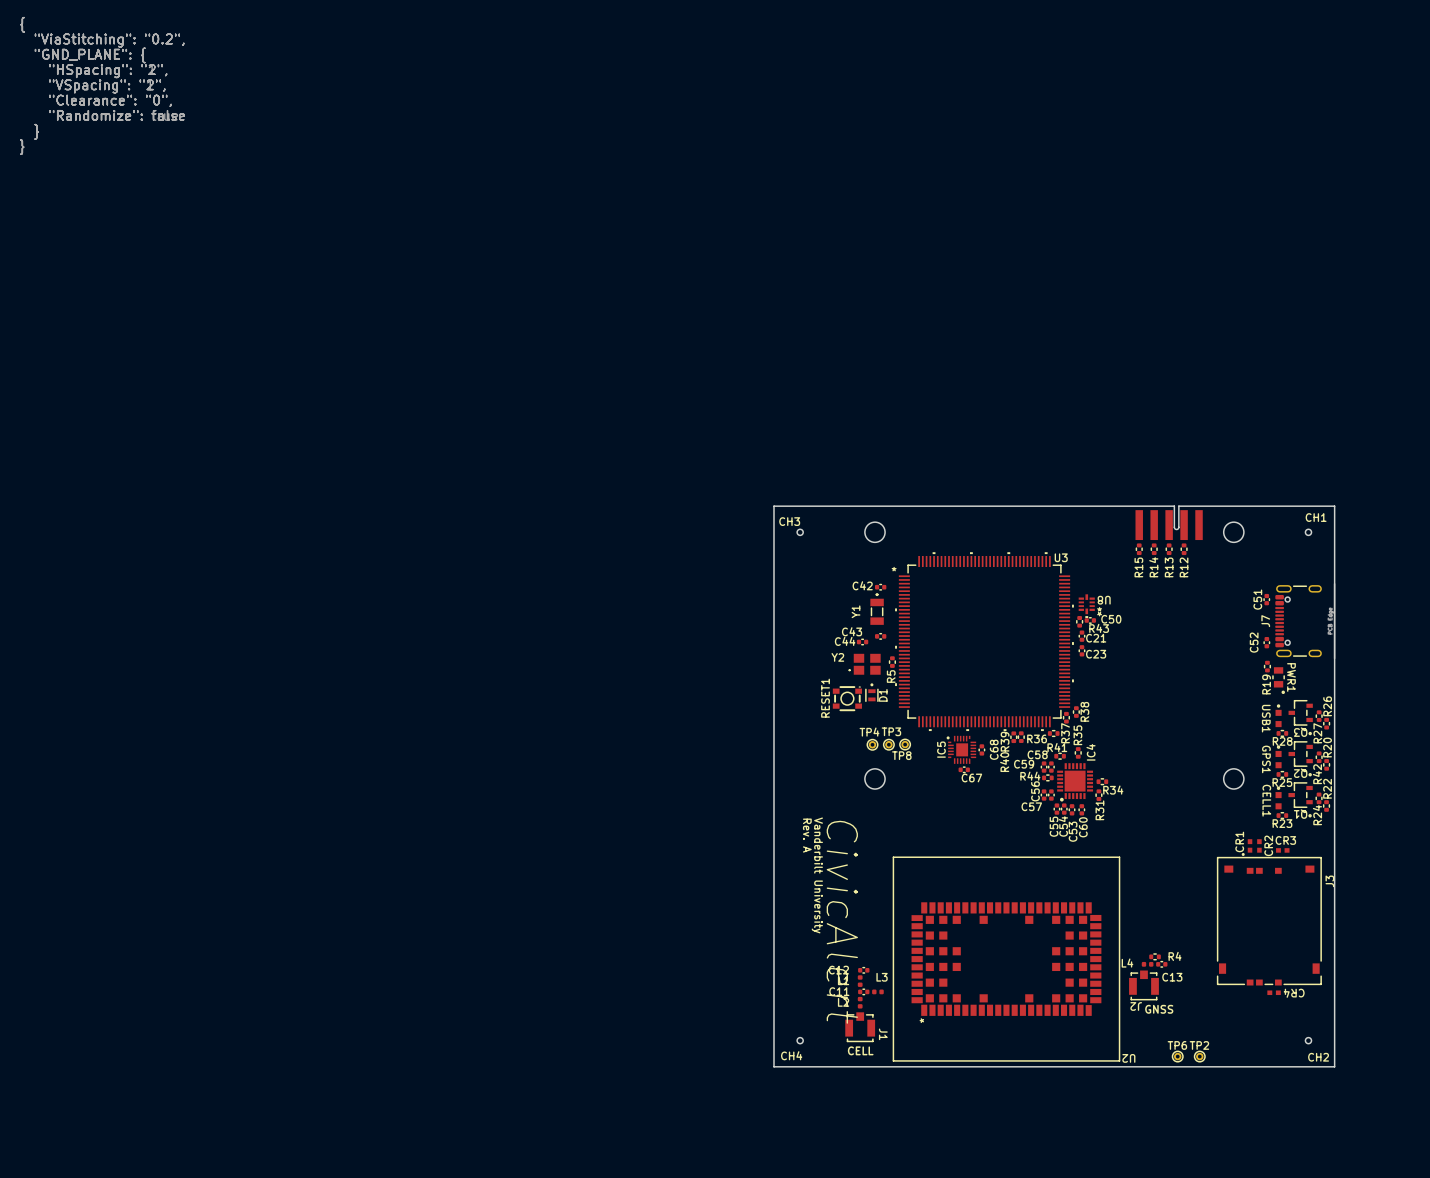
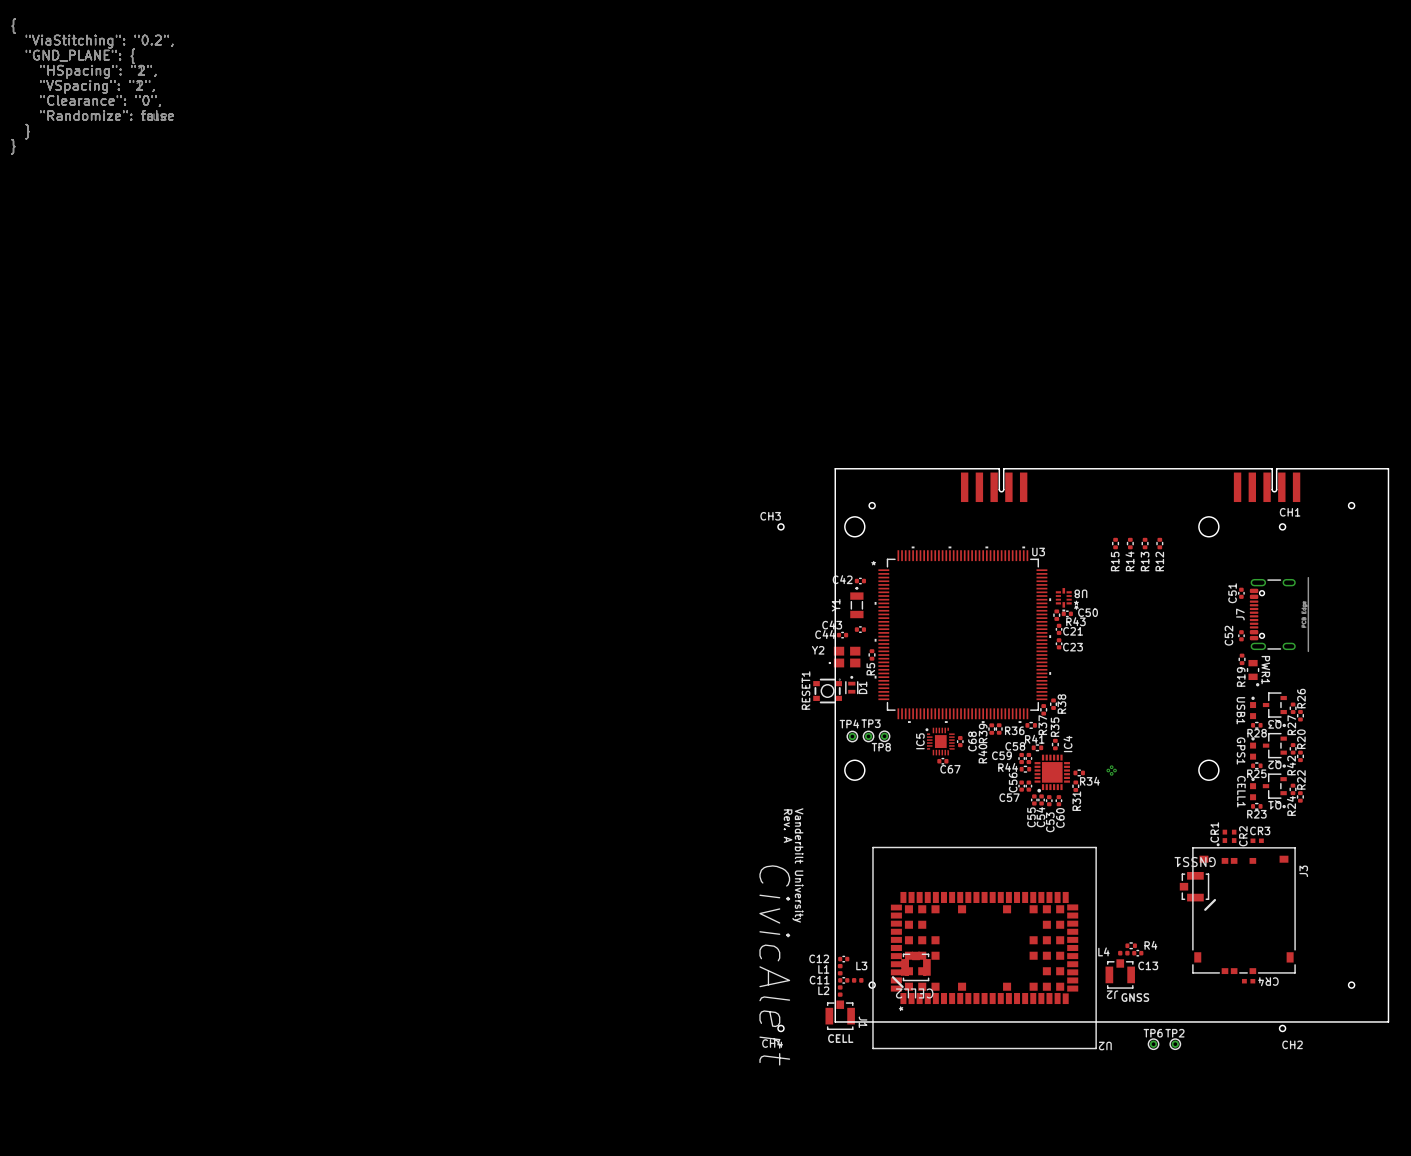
part: none -> (994, 487)
part: none -> (1267, 487)
board edge: (773, 506) (1174, 506) (1174, 527) (1176, 529) (1178, 527) (1178, 506) (1334, 506) (1334, 1066) (773, 1066) (773, 506) -> (835, 468) (835, 1021) (1388, 1021) (1388, 468) (1276, 468) (1276, 489) (1274, 491) (1272, 489) (1272, 468) (1003, 468) (1003, 489) (1001, 491) (999, 489) (999, 468) (835, 468)
part: none -> (872, 505)
part: none -> (1351, 505)
part: (1169, 525) -> none
part: none -> (1111, 770)
GNSS1: none -> (1197, 891)
text position: CivicAlert (842, 922) -> CivicAlert (774, 965)
CELL2: none -> (911, 969)
part: none -> (872, 985)
part: none -> (1351, 985)

